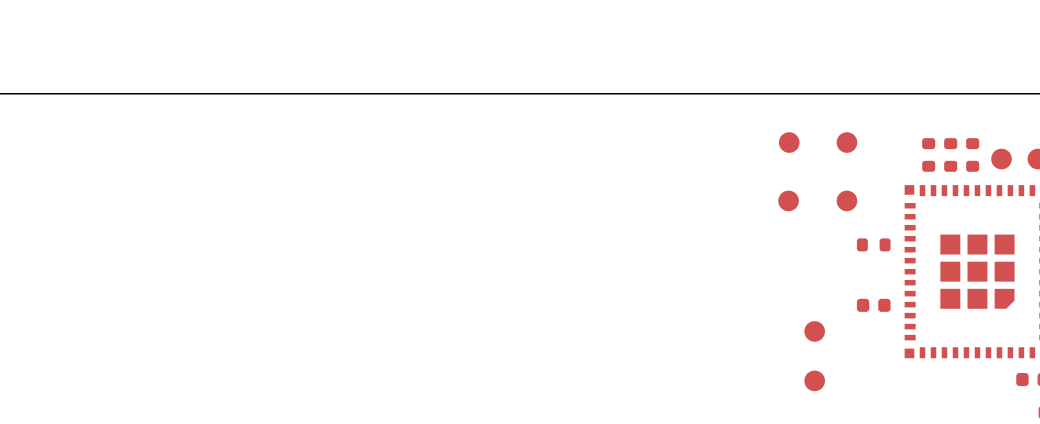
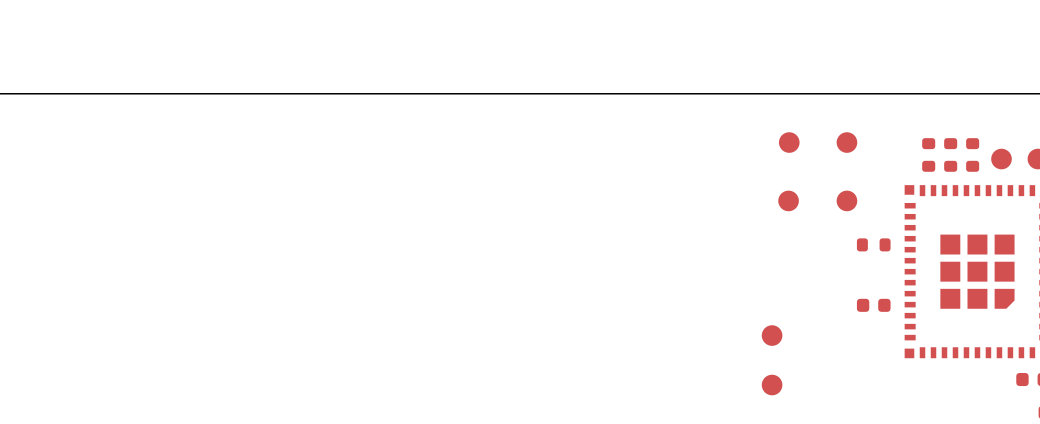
part: (814, 331) -> none
part: none -> (772, 335)
part: (814, 380) -> none
part: none -> (772, 385)

